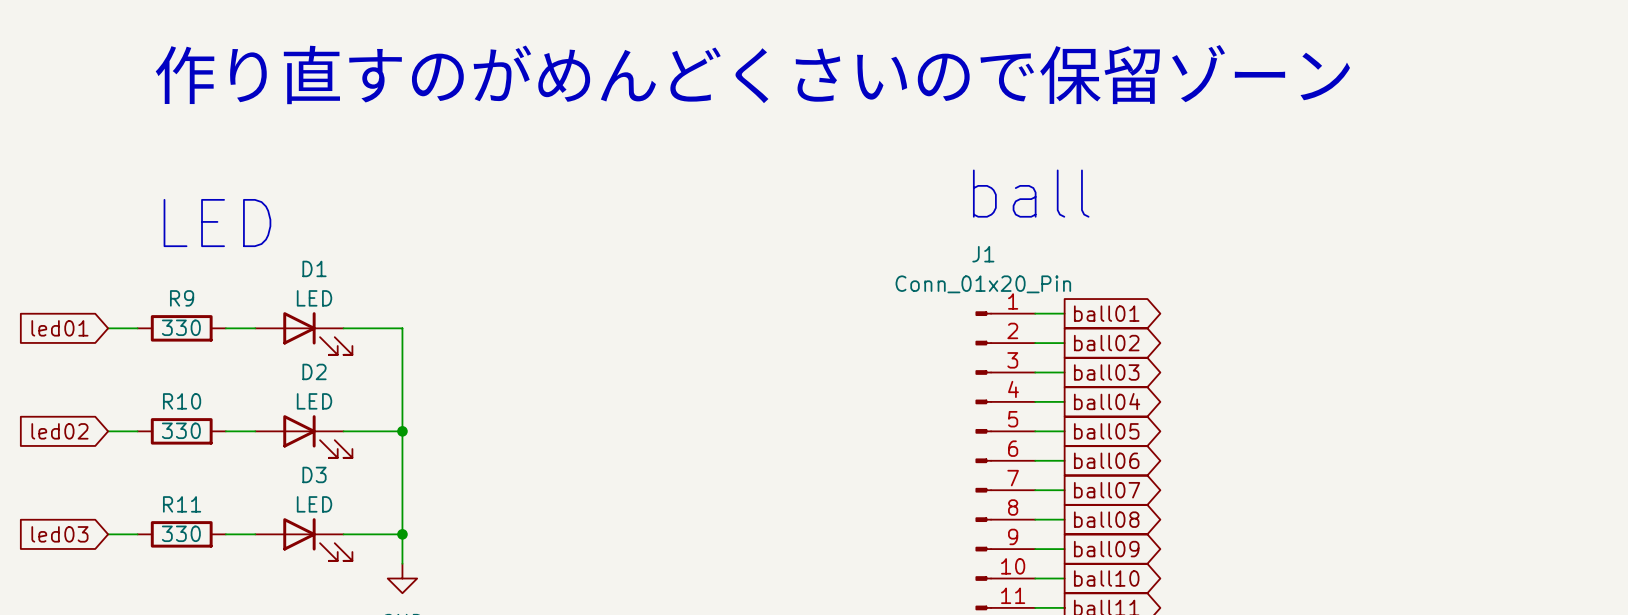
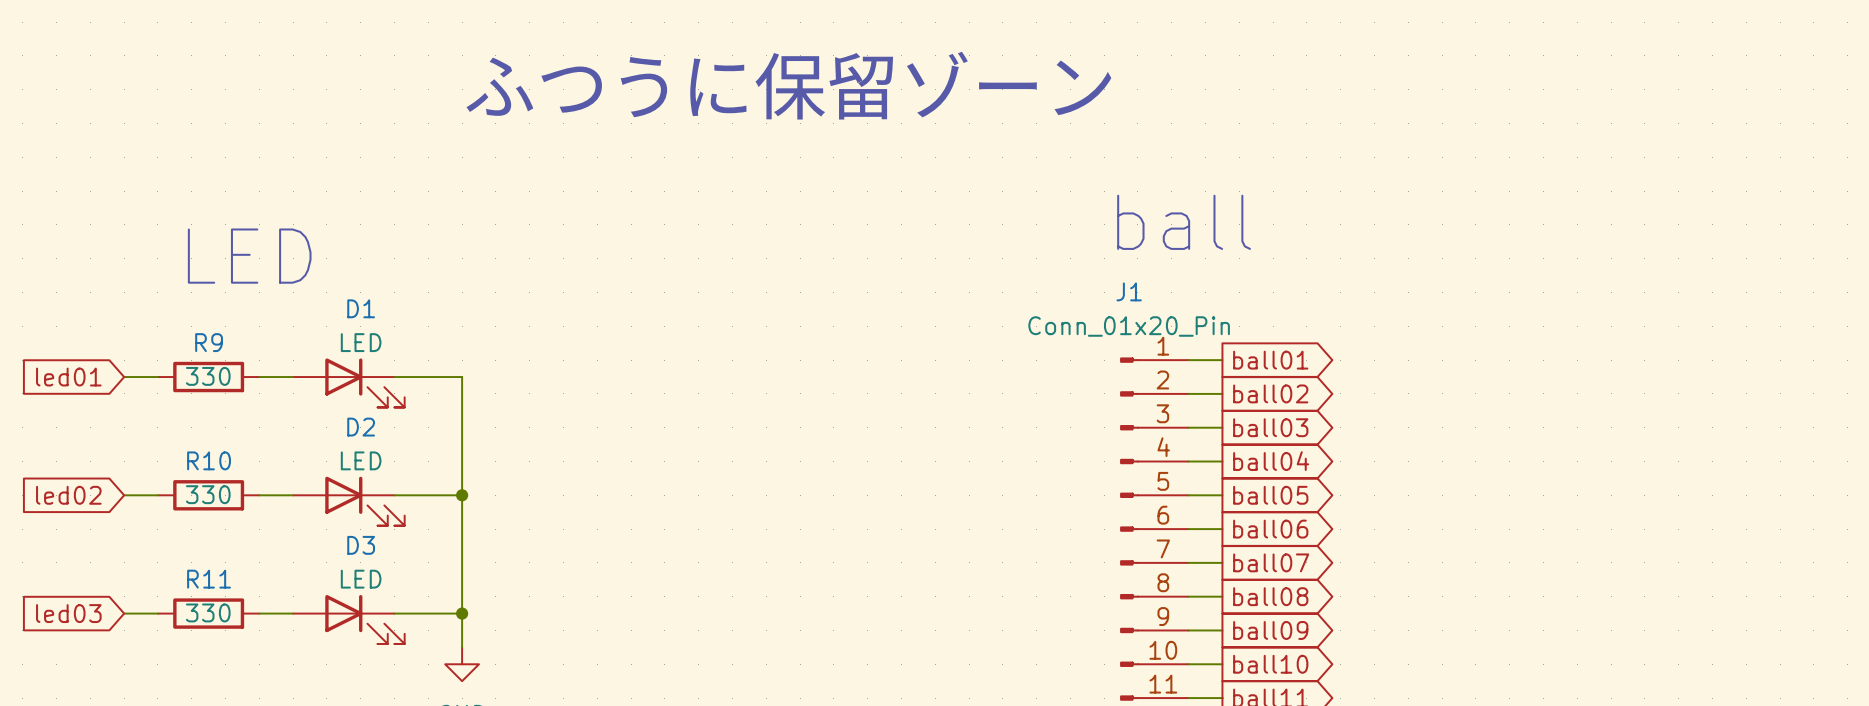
text: none -> ふつうに保留ゾーン (788, 85)
text: 作り直すのがめんどくさいので保留ゾーン (752, 74) -> none

